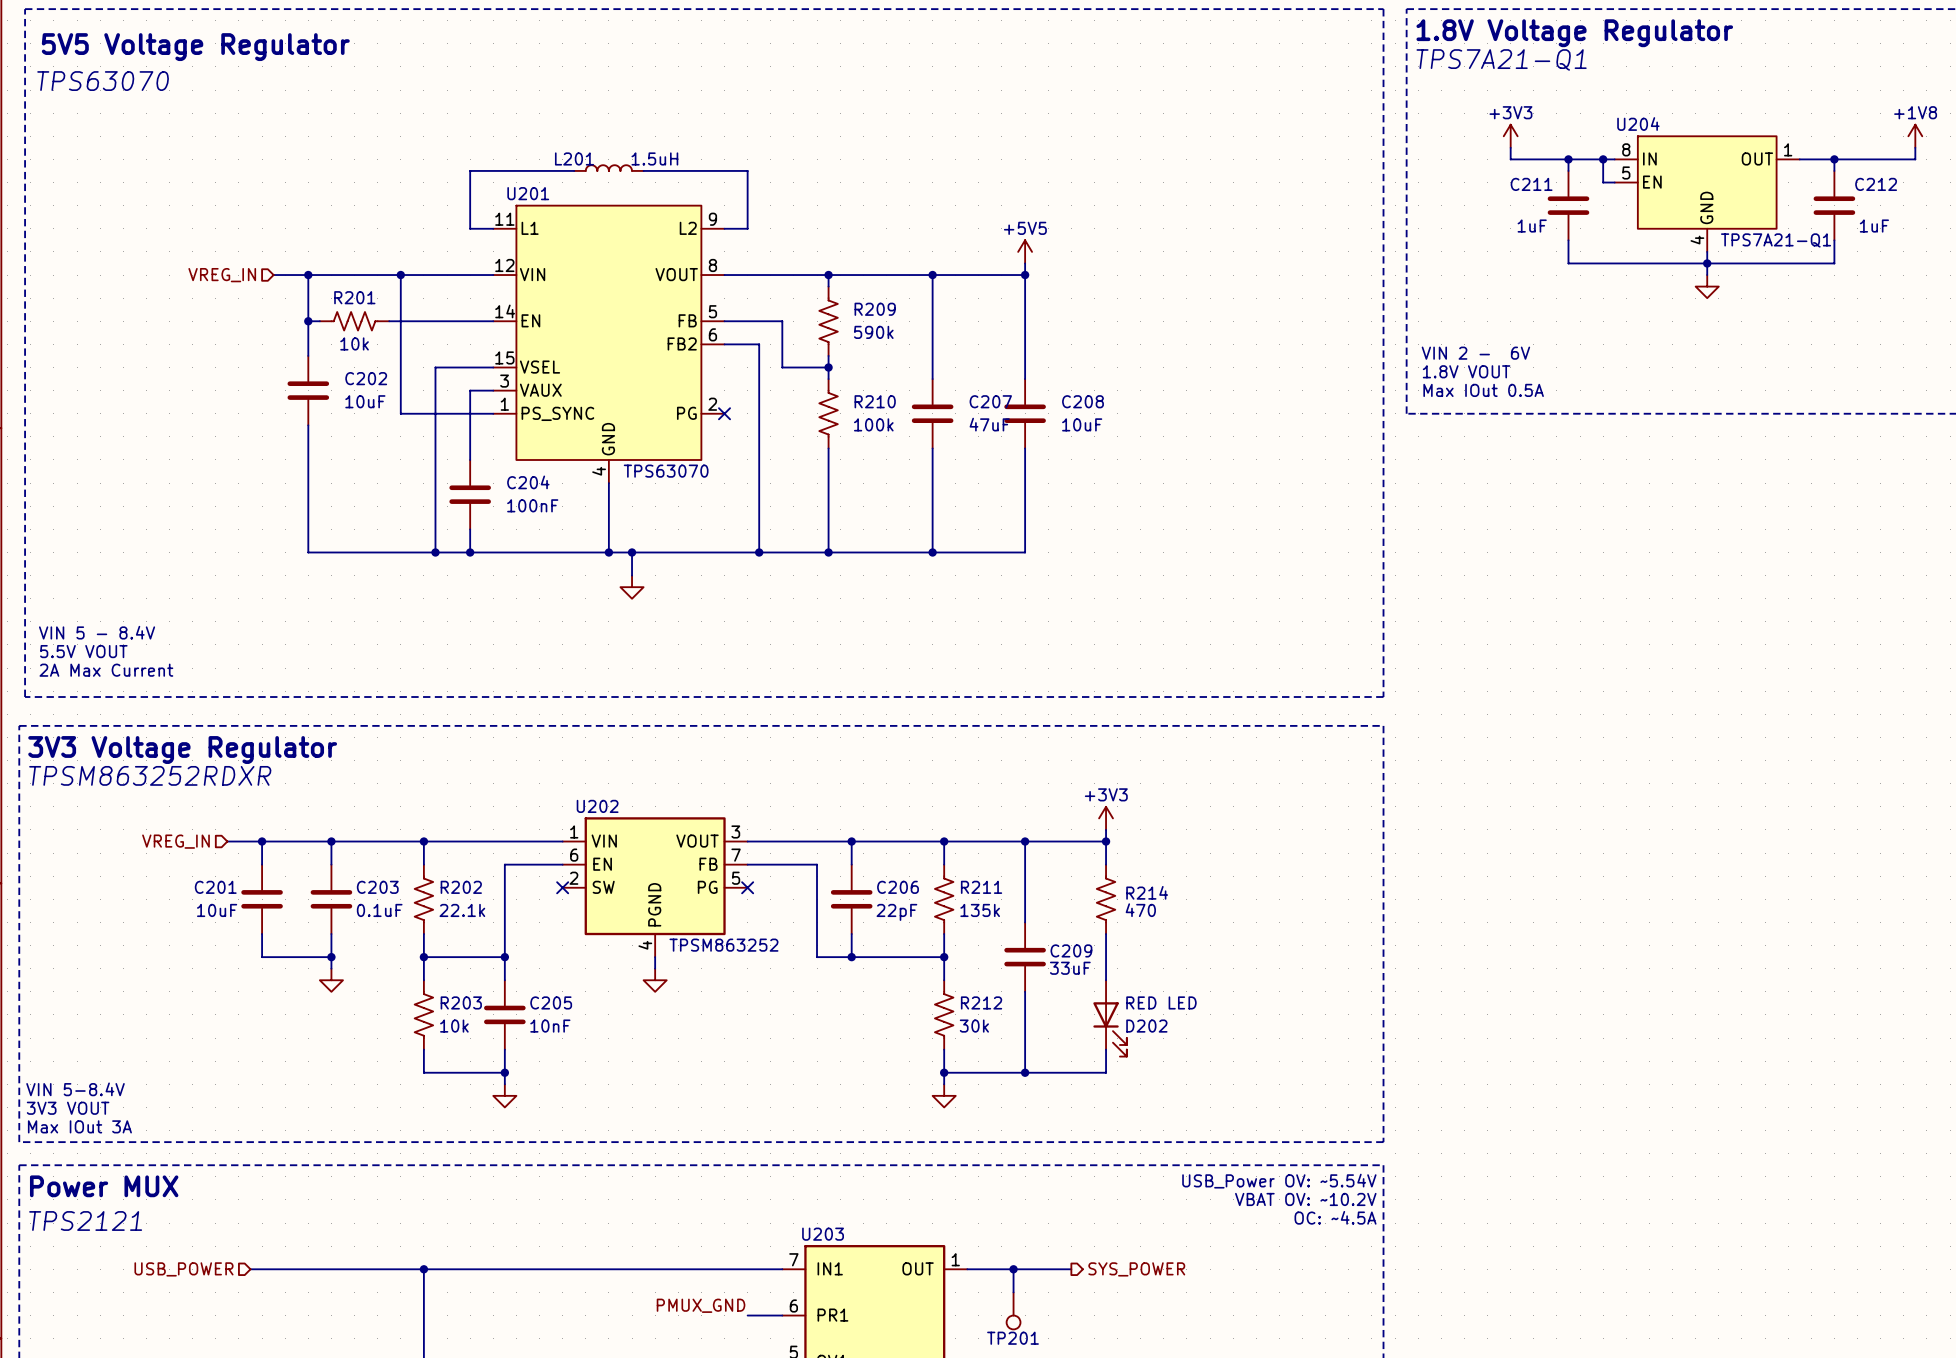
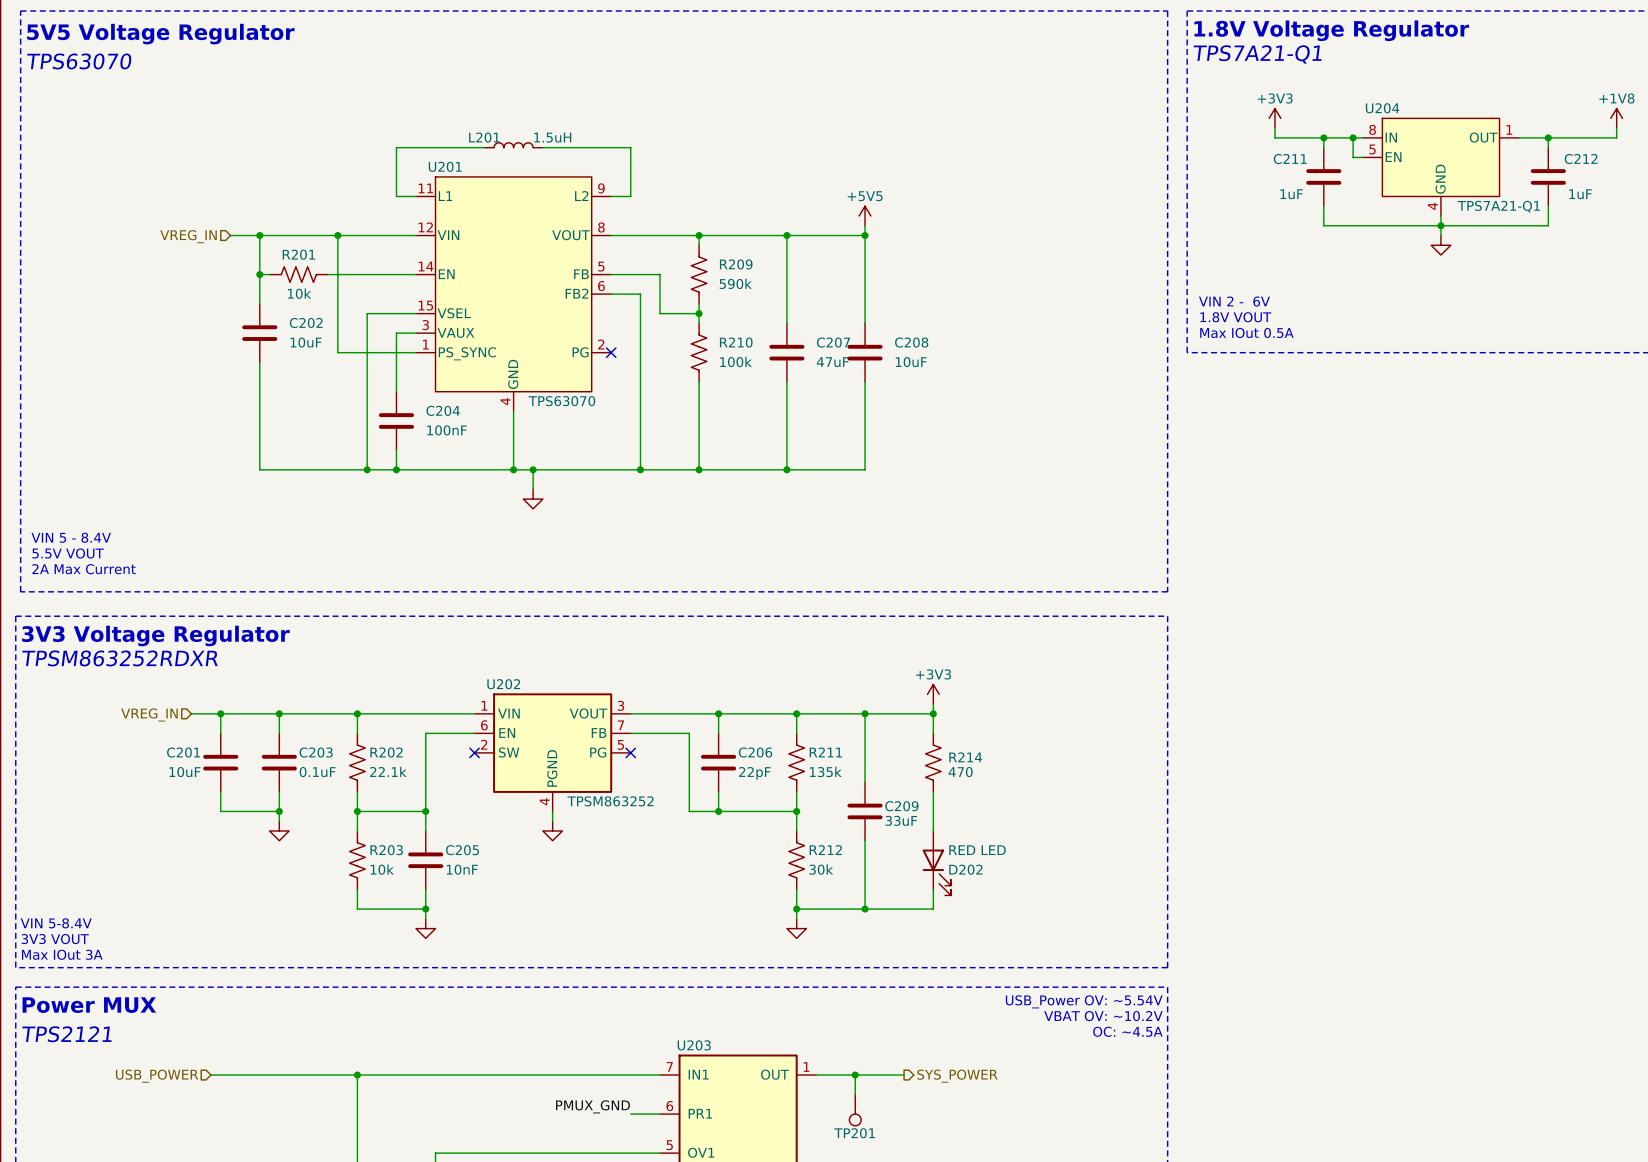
text: none -> 5V5 Voltage Regulator (160, 34)
text: 5V5 Voltage Regulator (195, 47) -> TPS63070 (79, 61)
text: TPS63070 (103, 81) -> none

